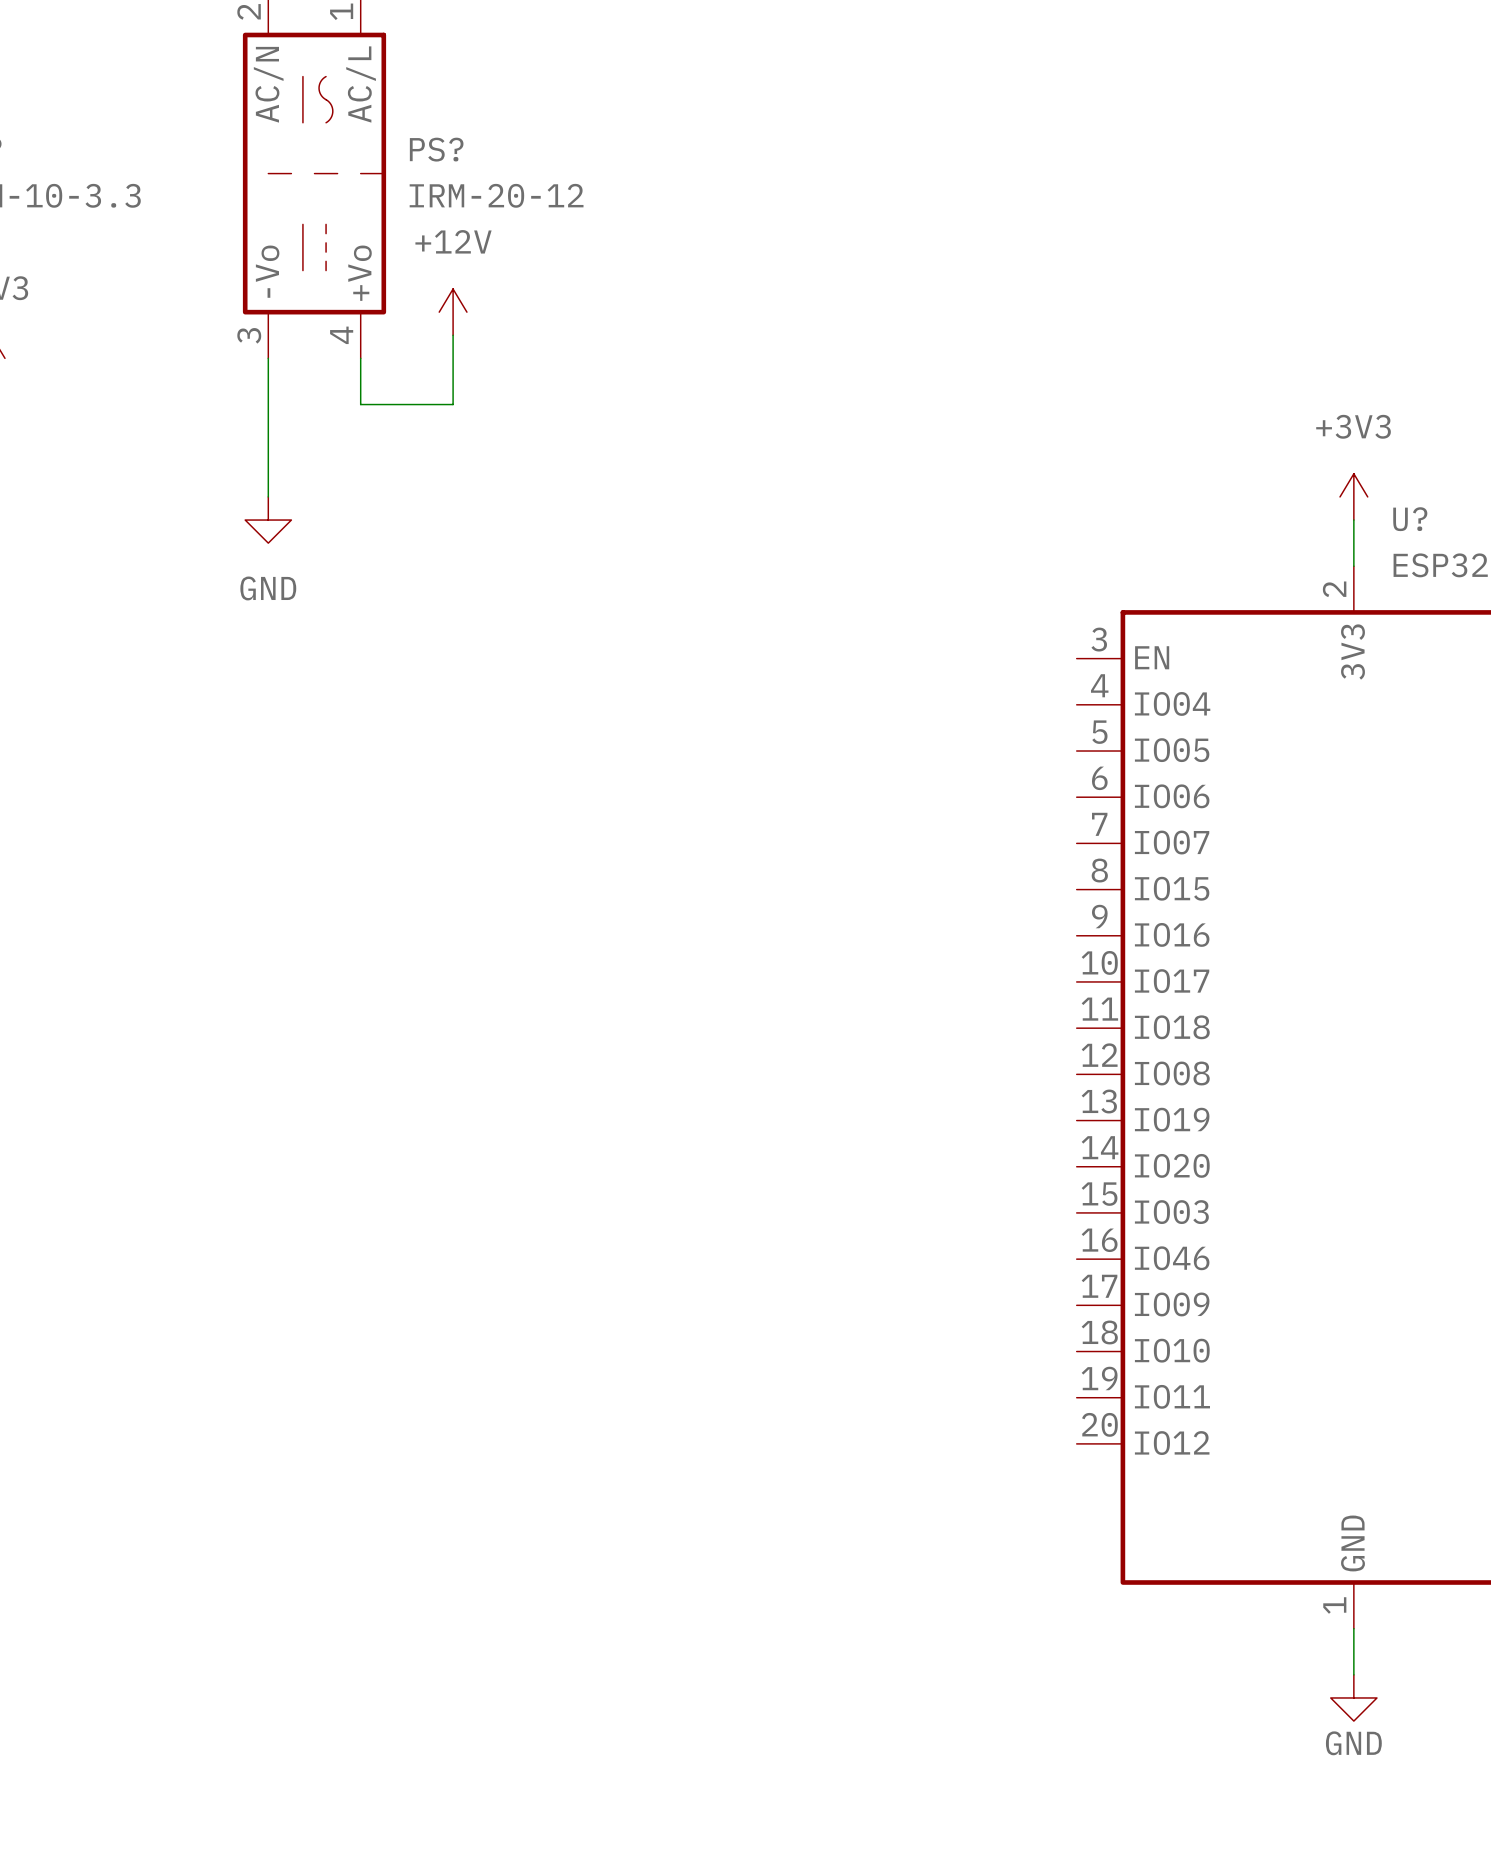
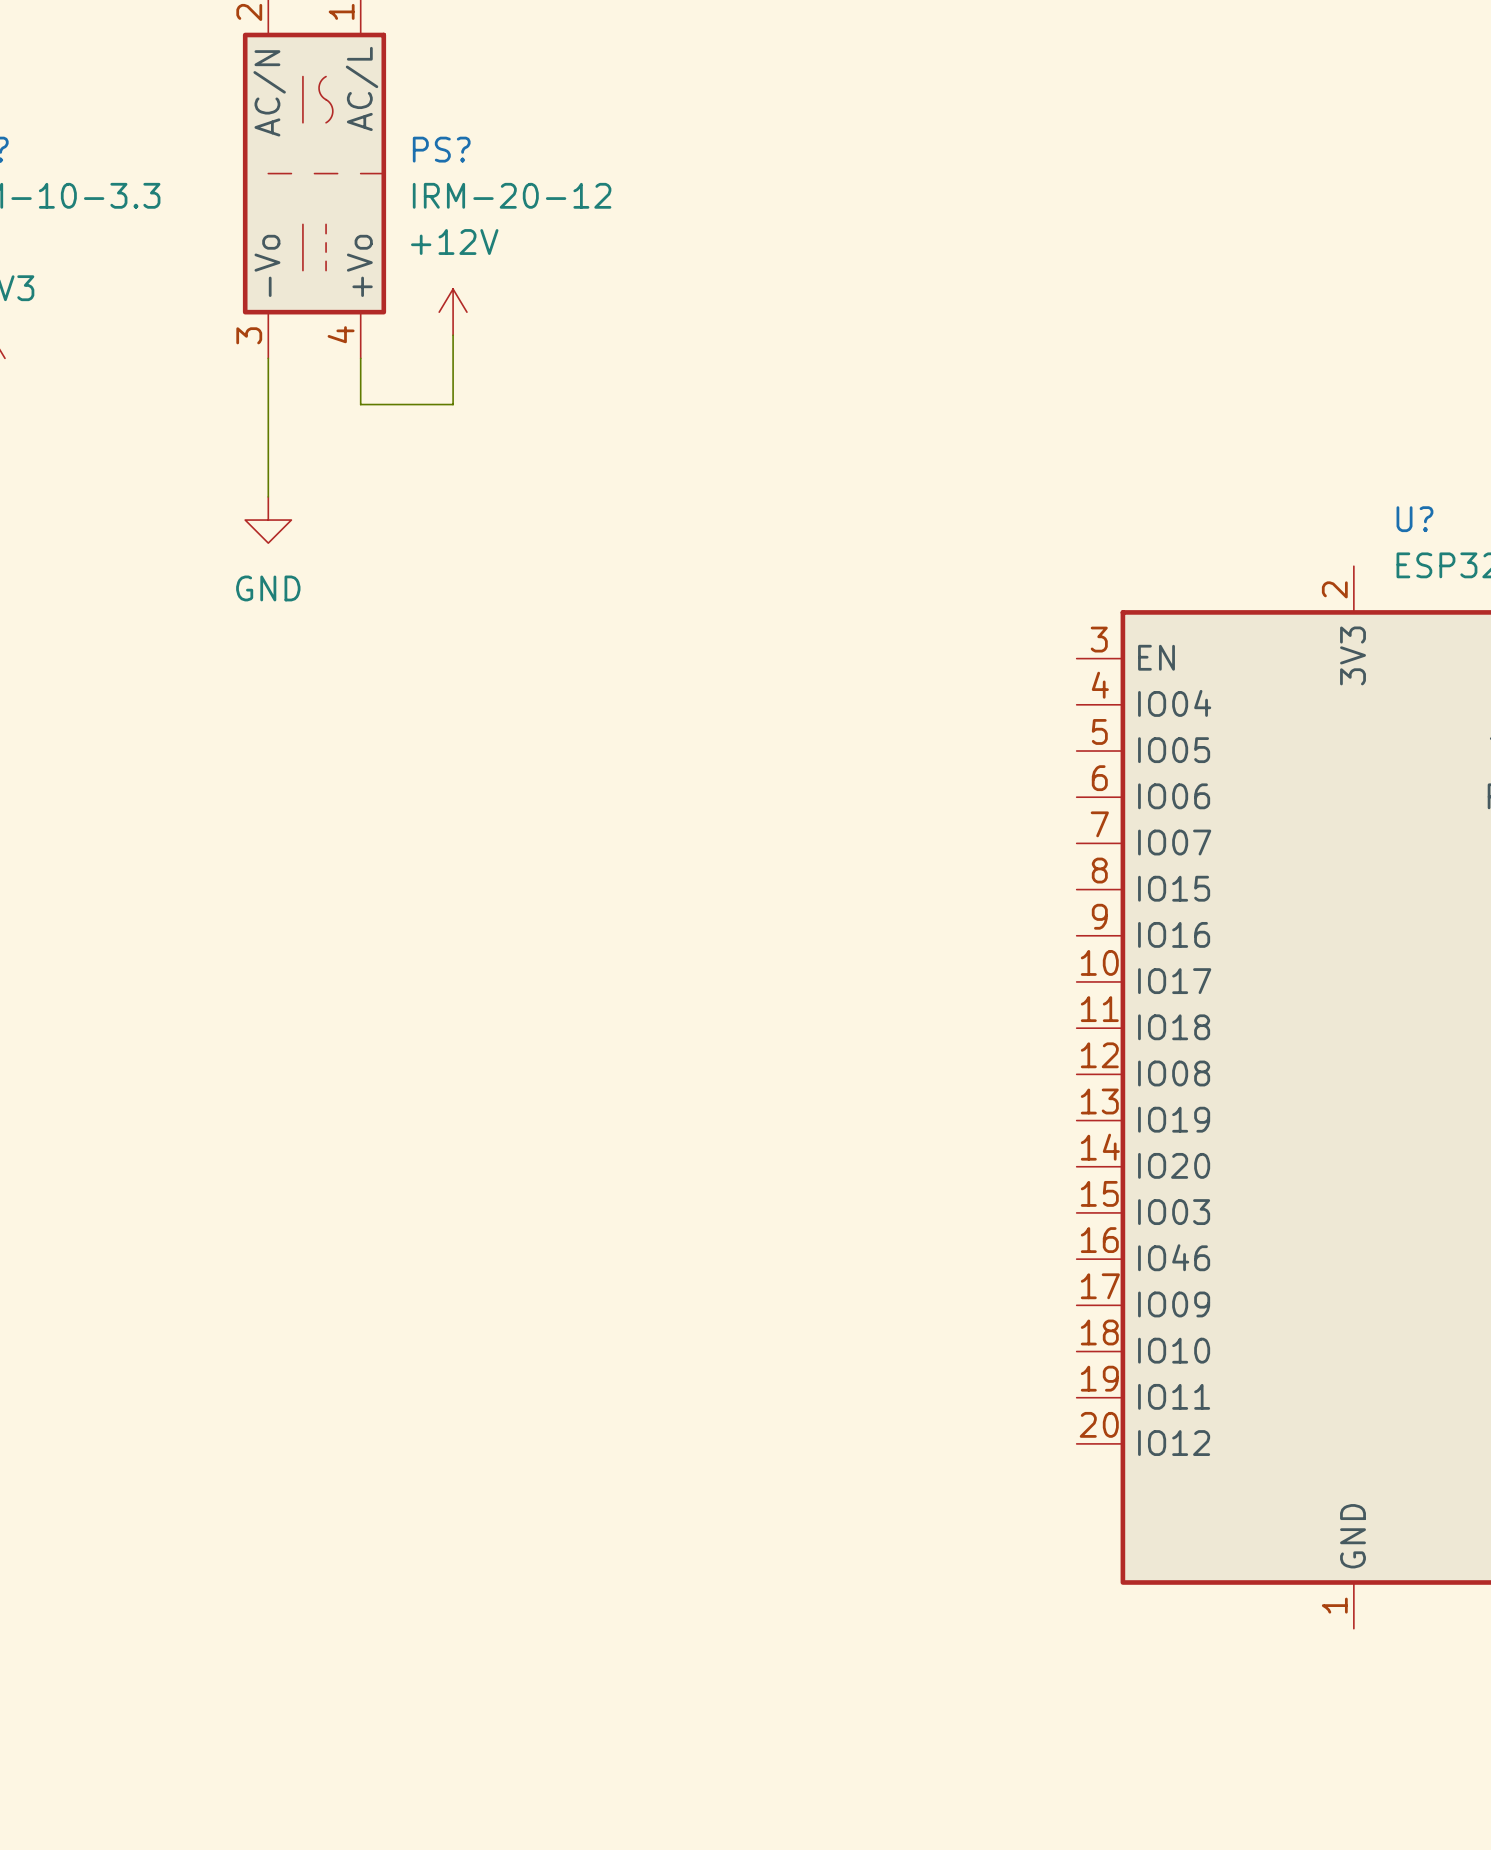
power symbol: +3V3 (1353, 496) -> none
wire: (1353, 520) (1353, 566) -> none
wire: (1353, 1628) (1353, 1674) -> none
power symbol: GND (1353, 1697) -> none

